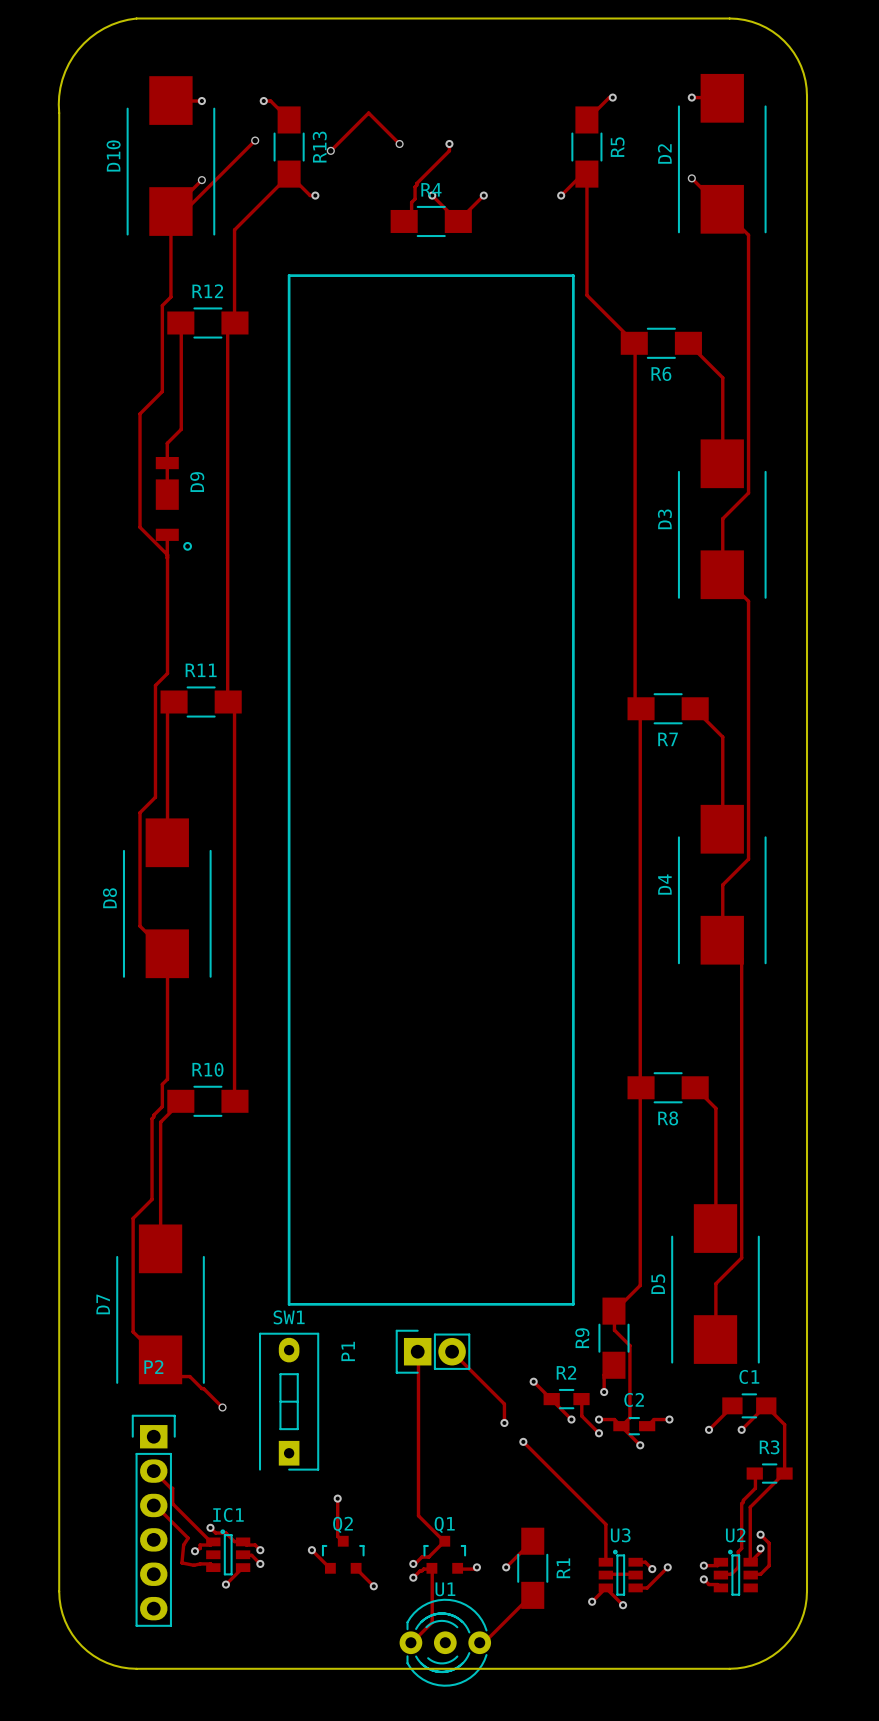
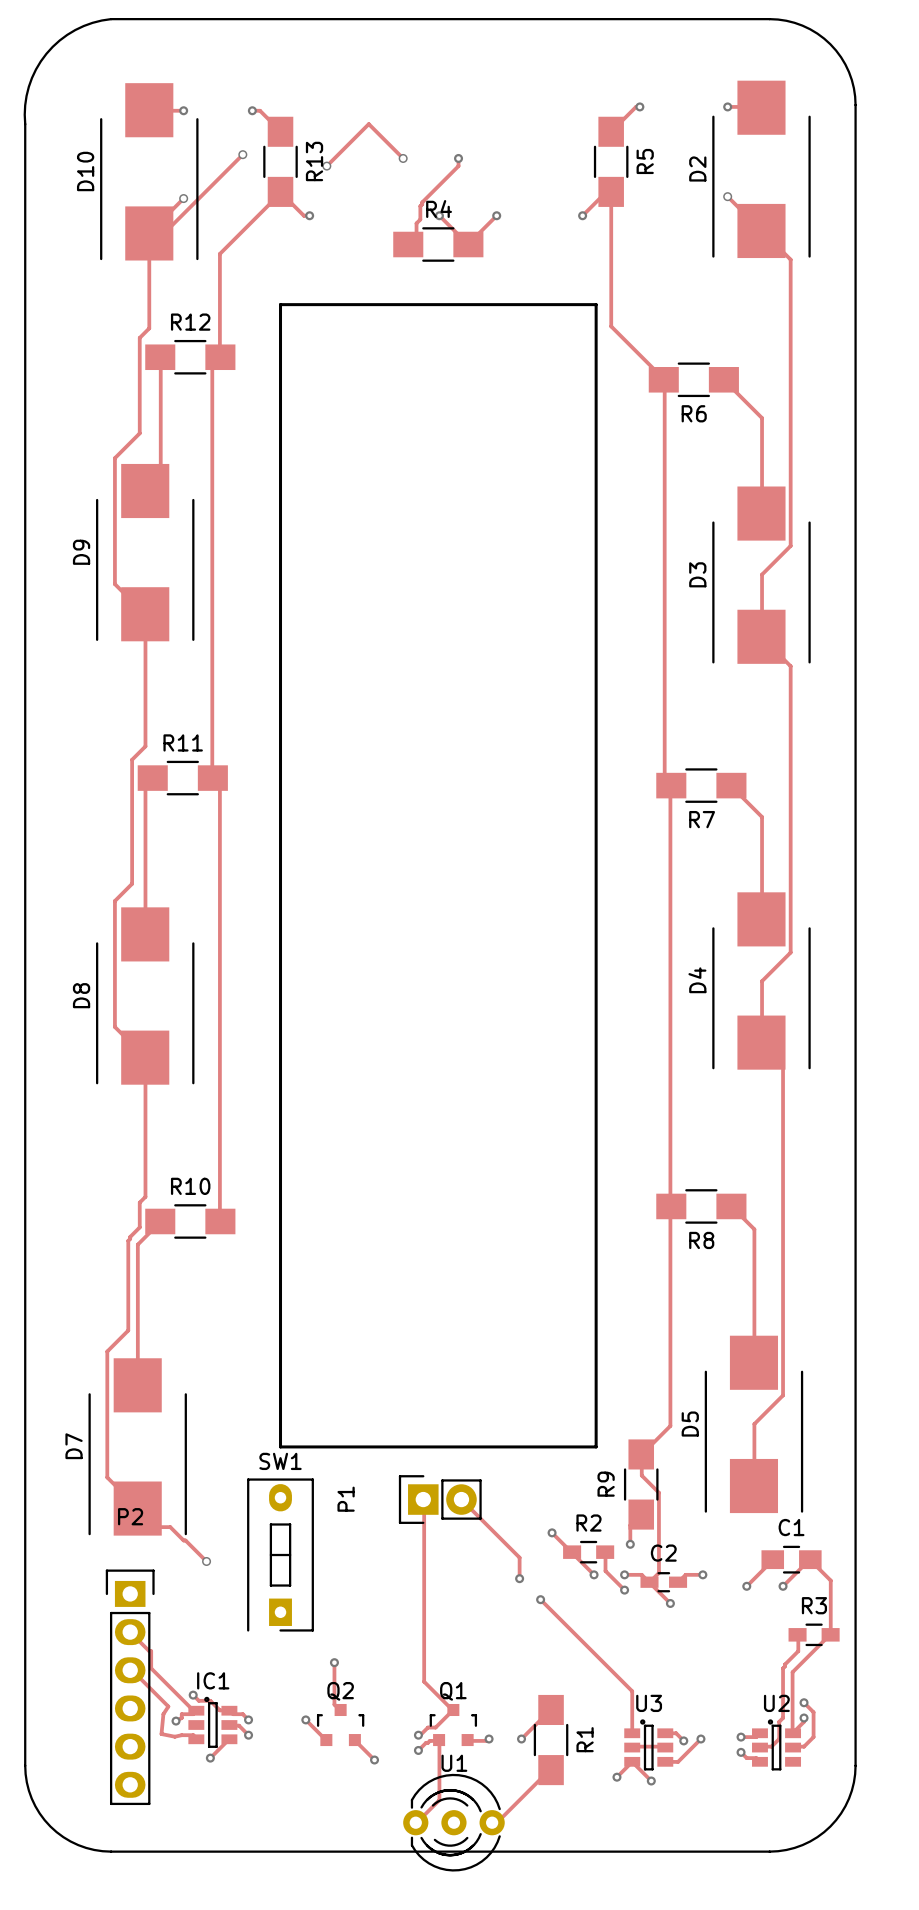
track: (167, 443) (167, 494) -> none
D9 footprint: [155, 457, 192, 551] -> [96, 463, 195, 642]
D9 name position: D9 (197, 482) -> D9 (81, 552)
track: (167, 534) (167, 557) -> none

